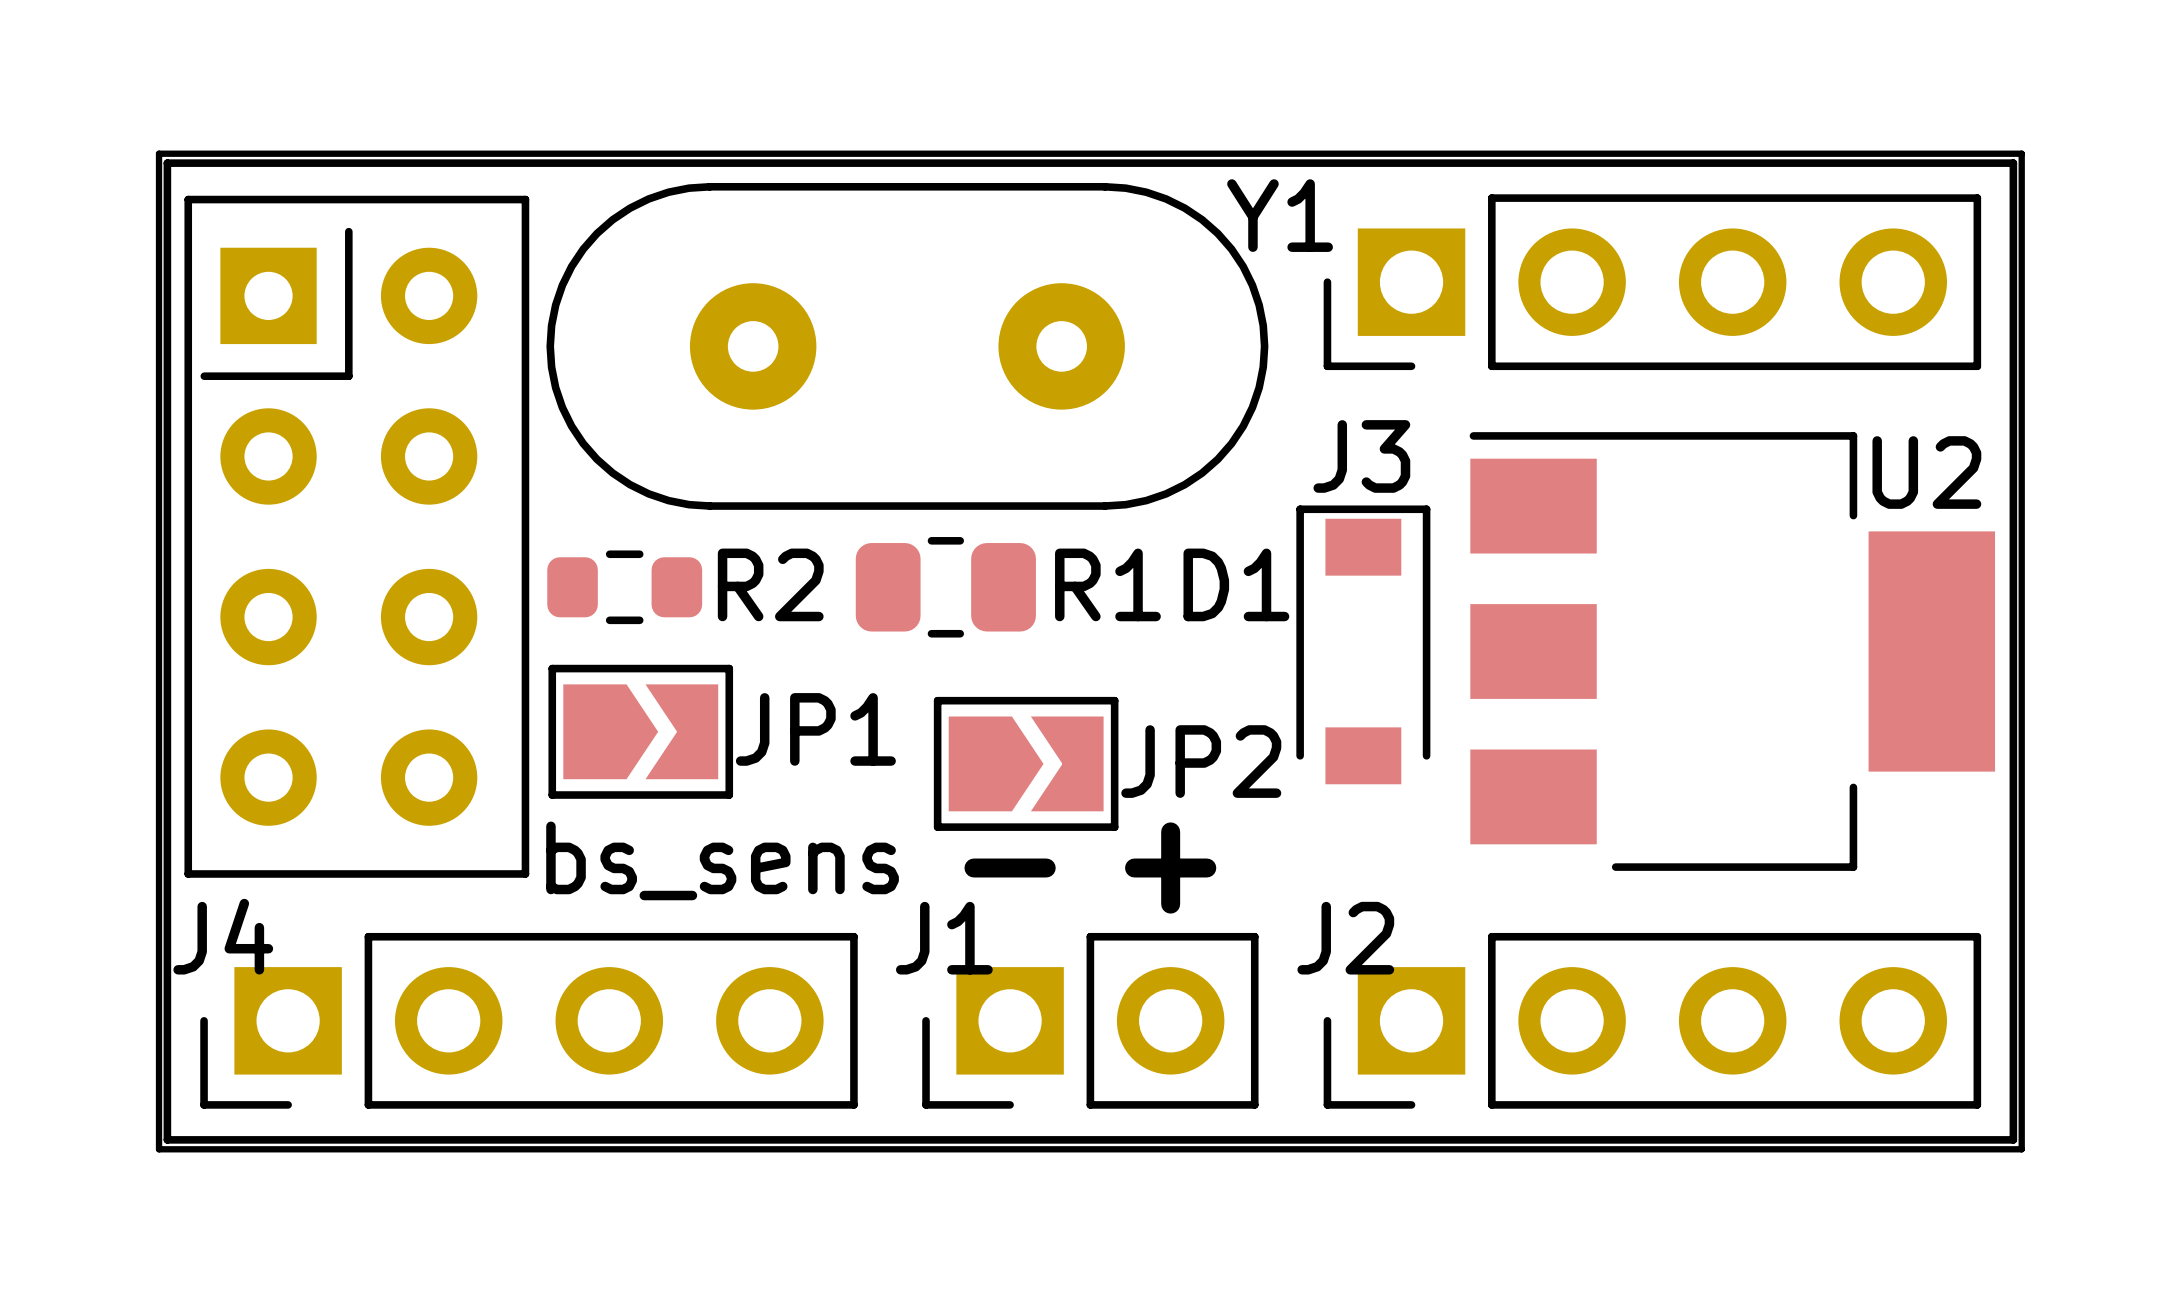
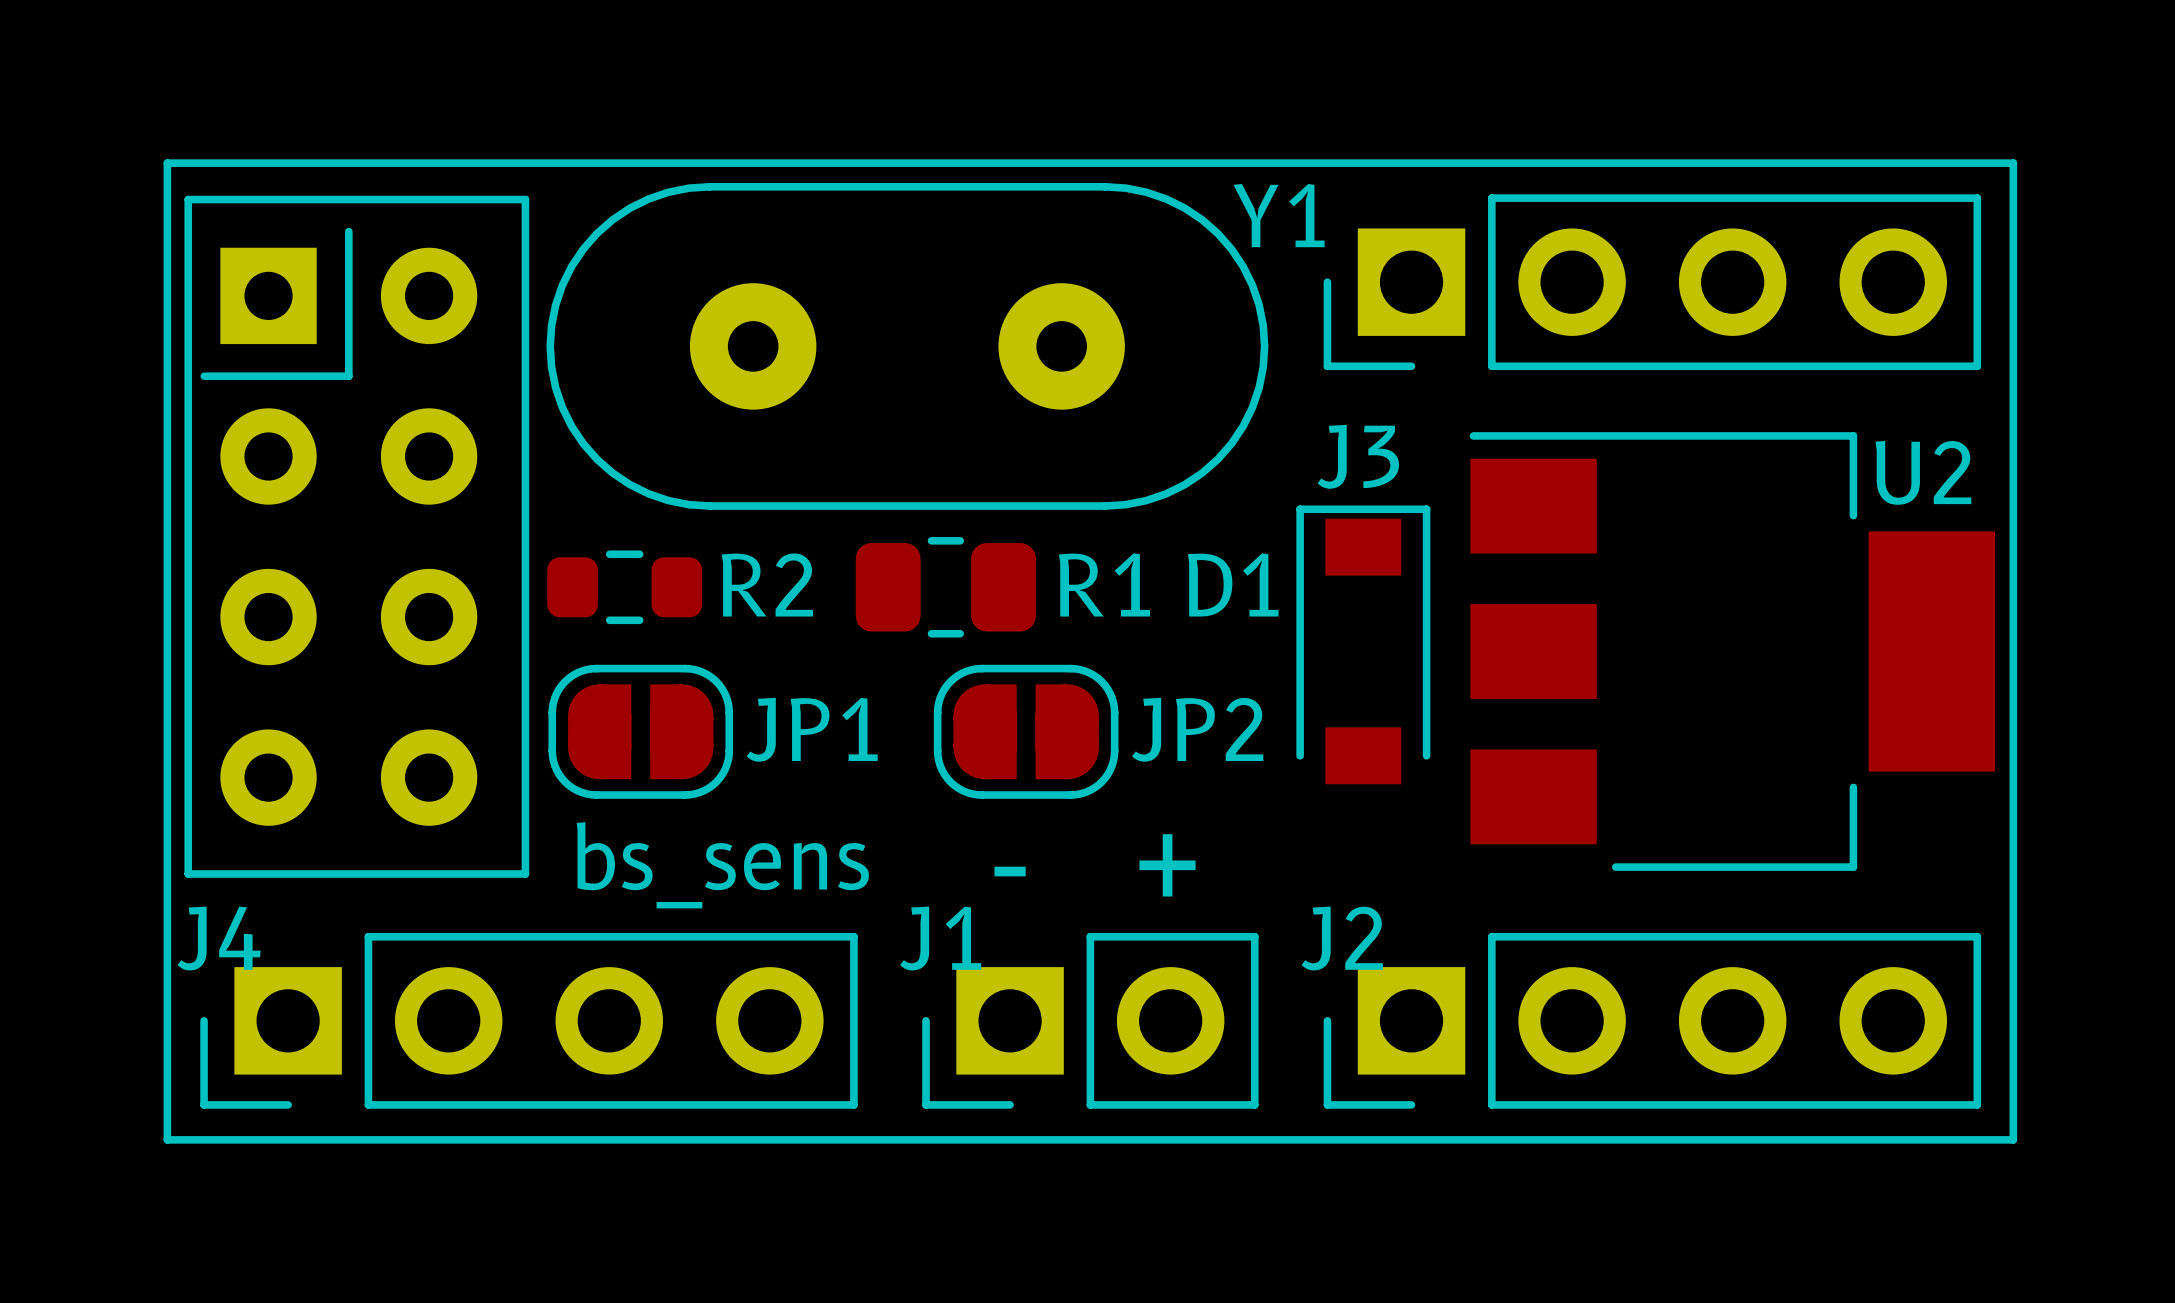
board edge: (159, 153) (159, 1149) (2021, 1149) (2021, 153) (159, 153) -> none
JP1 footprint: [548, 664, 734, 799] -> [548, 664, 734, 799]
JP2 footprint: [933, 696, 1119, 831] -> [933, 664, 1119, 799]
JP2 name position: JP2 (1201, 761) -> JP2 (1197, 729)

